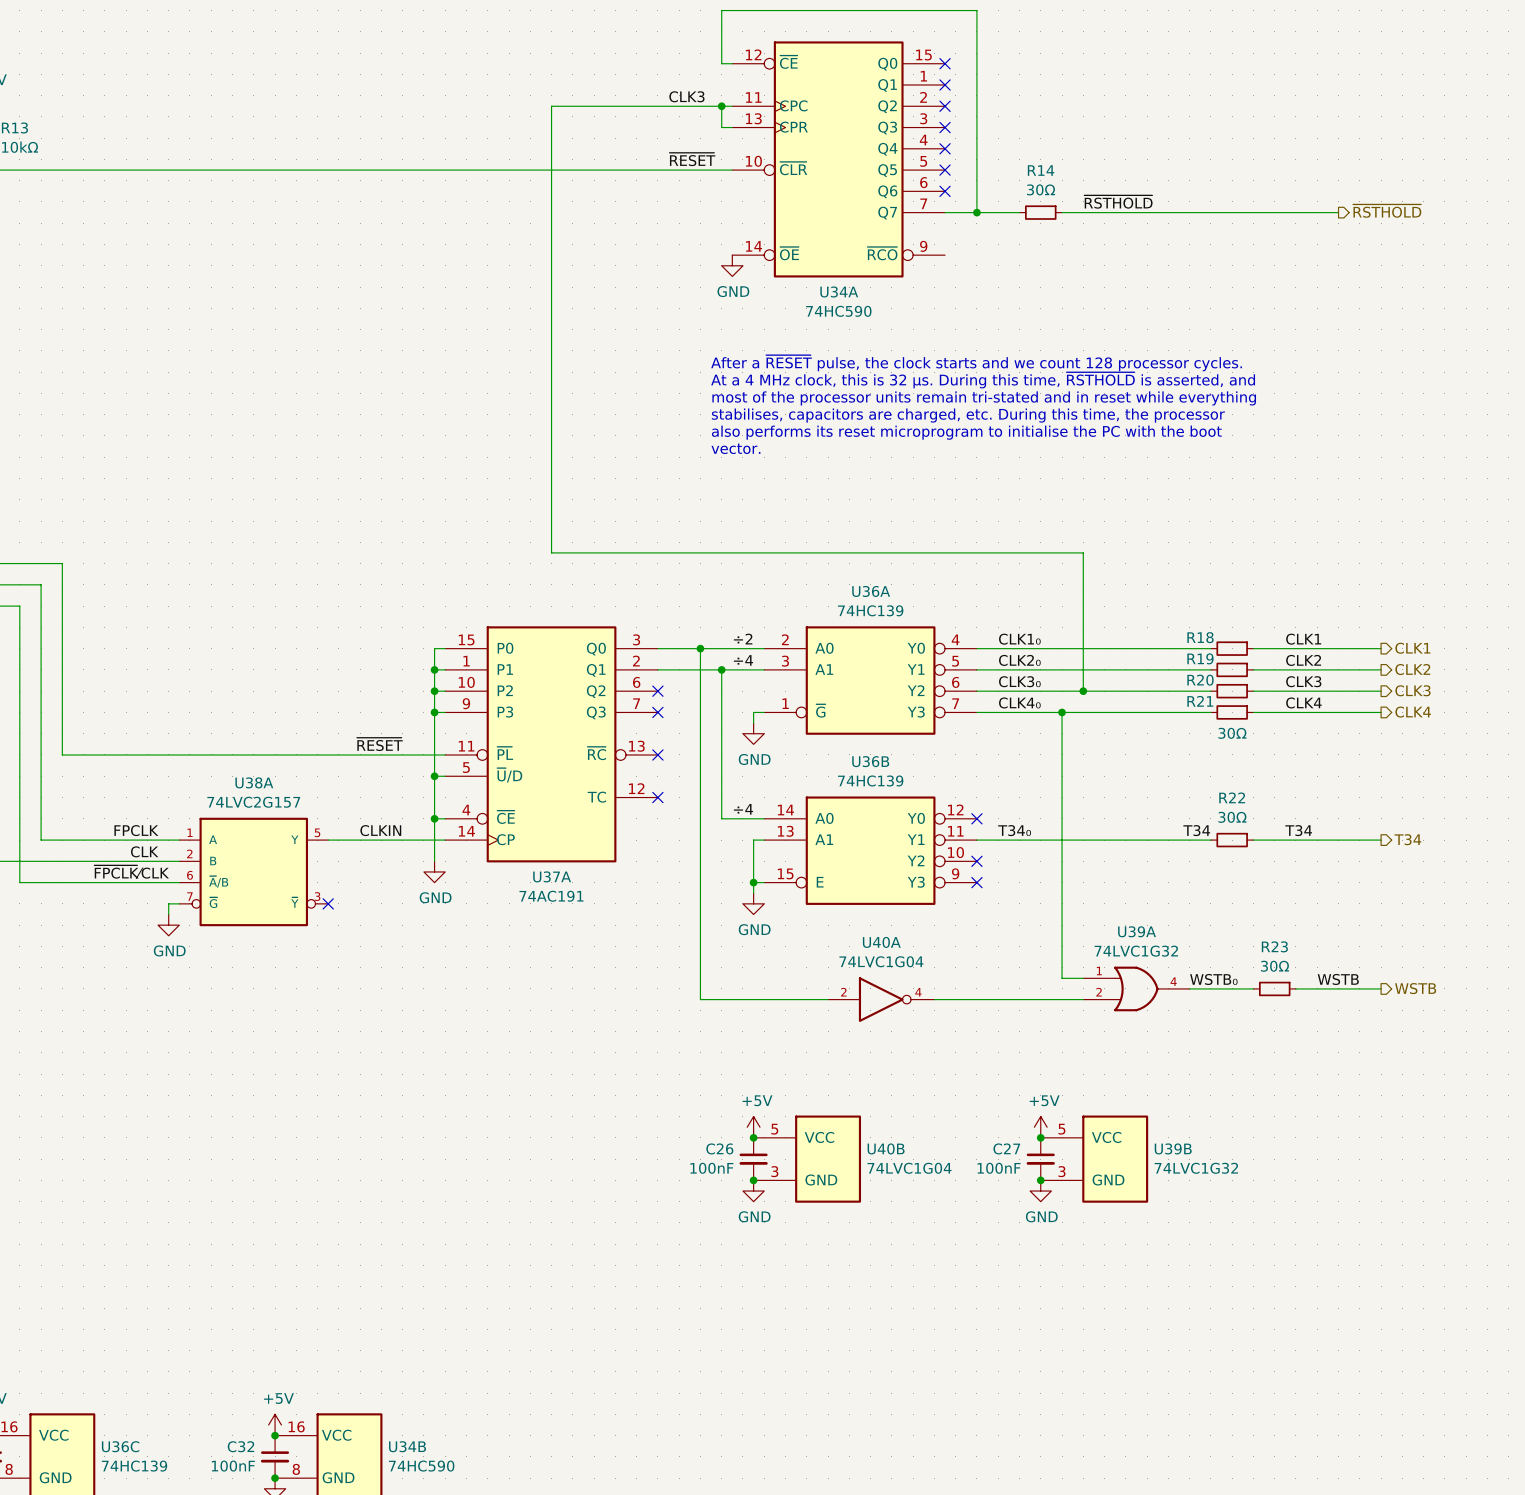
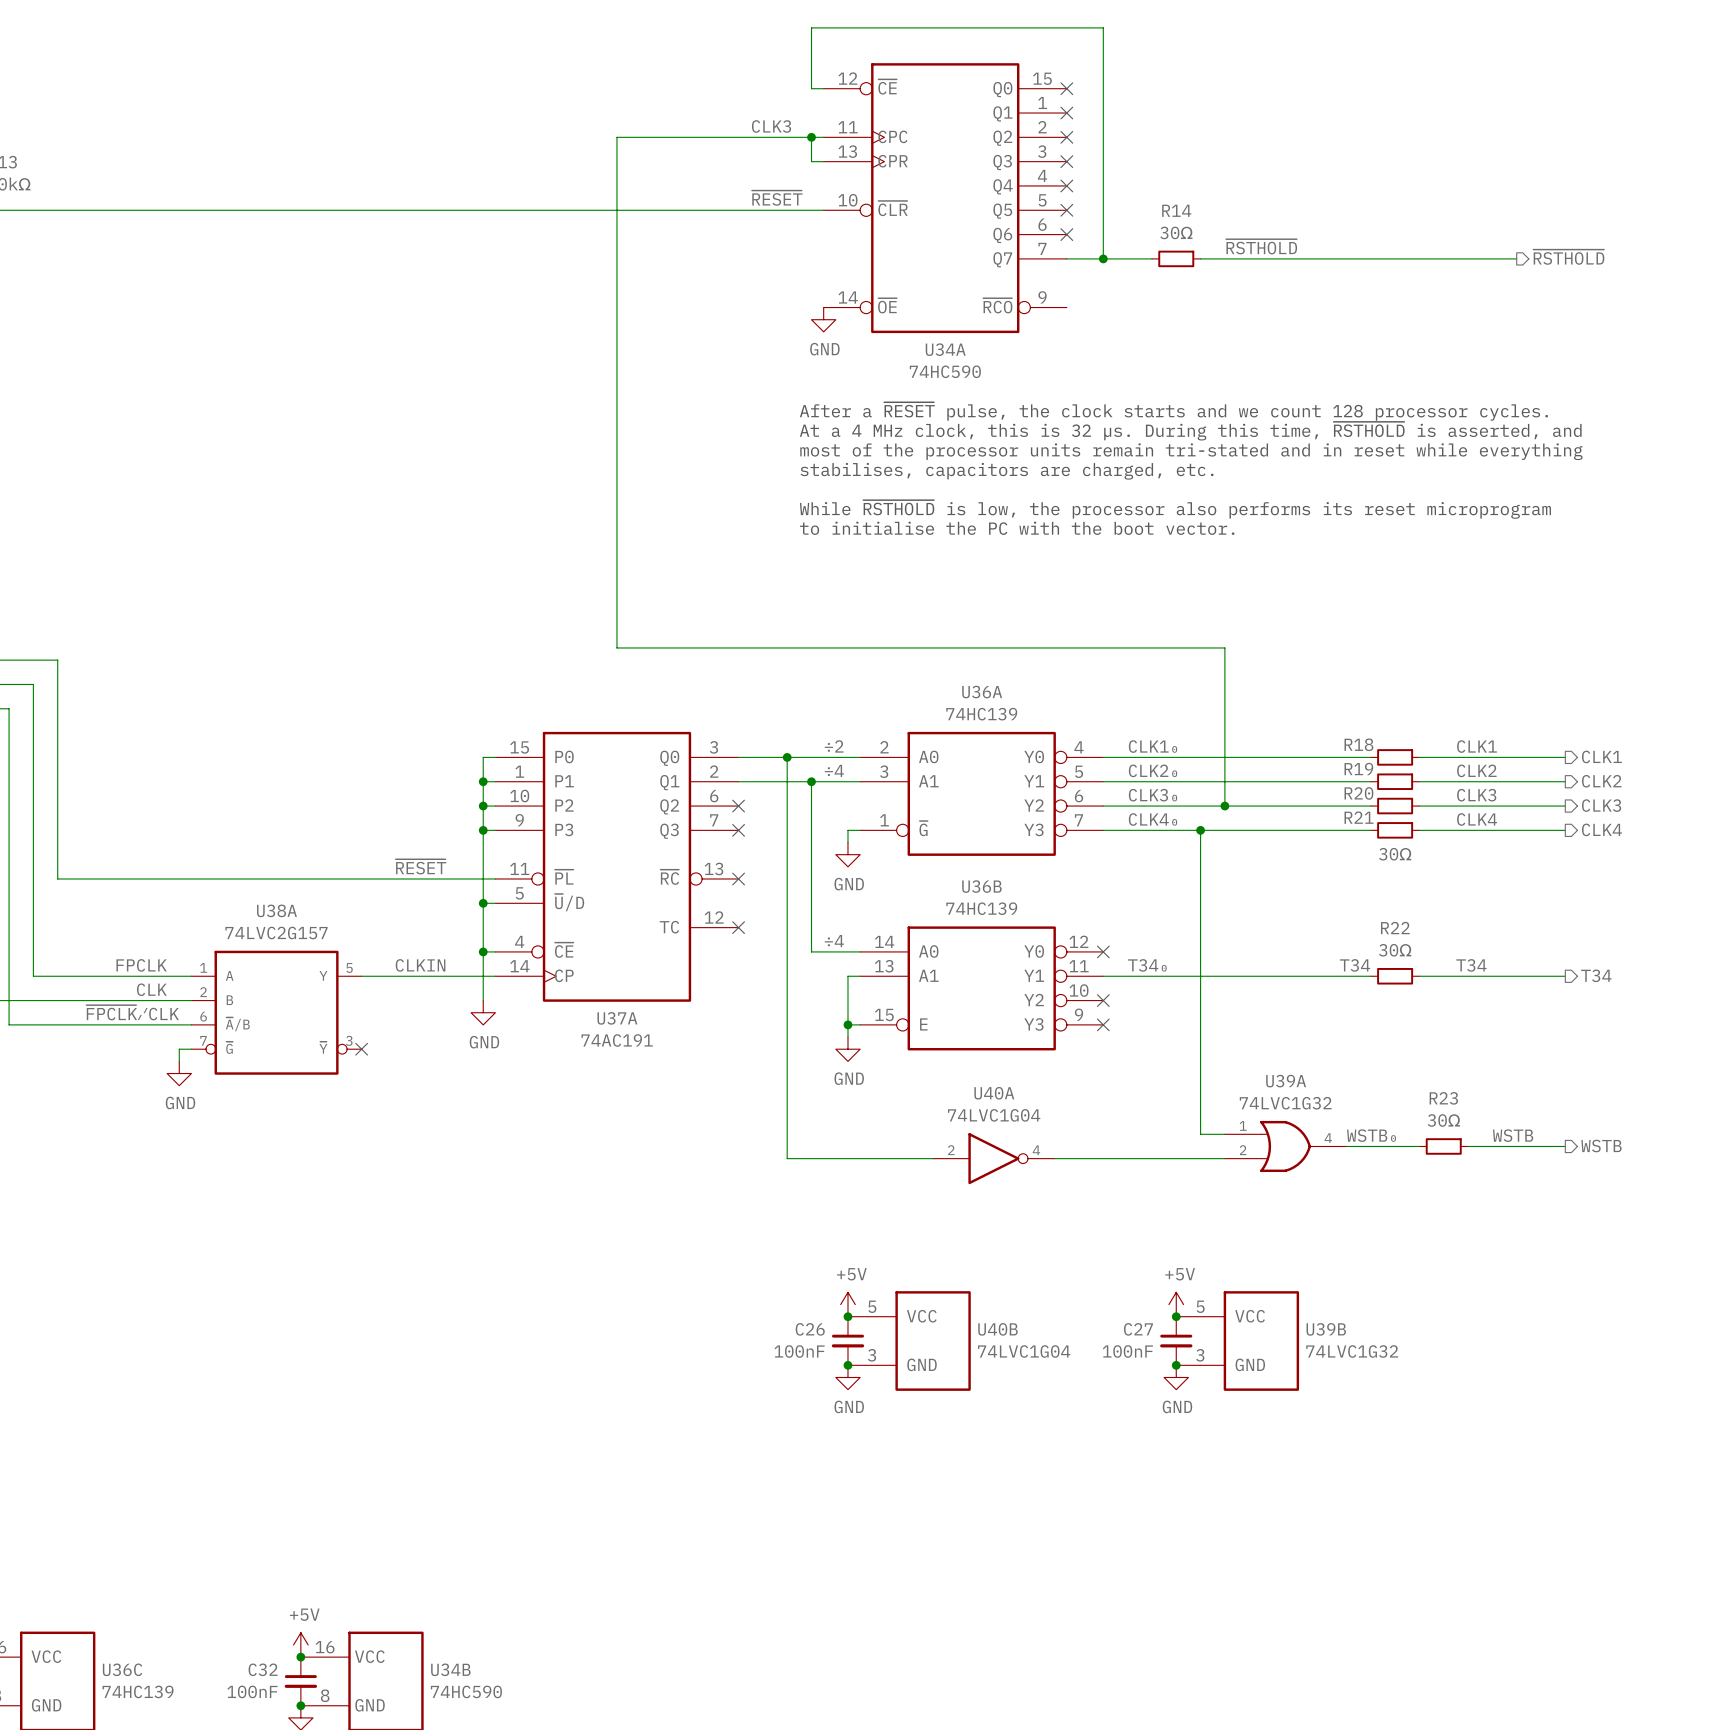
text: none -> After a ~{RESET} pulse, the clock starts and we count 128 processor cycles. (1173, 411)
text: After a ~{RESET} pulse, the clock starts and we count 128 processor cycles. (976, 363) -> At a 4 MHz clock, this is 32 µs. During this time, ~{RSTHOLD} is asserted, and (1190, 431)
text: At a 4 MHz clock, this is 32 µs. During this time, ~{RSTHOLD} is asserted, and (983, 380) -> most of the processor units remain tri-stated and in reset while everything (1191, 451)
text: most of the processor units remain tri-stated and in reset while everything (984, 398) -> stabilises, capacitors are charged, etc. (1007, 471)
text: stabilises, capacitors are charged, etc. During this time, the processor (968, 415) -> none
text: also performs its reset microprogram to initialise the PC with the boot (966, 432) -> While ~{RSTHOLD} is low, the processor also performs its reset microprogram (1175, 509)
text: vector. (735, 448) -> to initialise the PC with the boot vector. (1017, 528)

